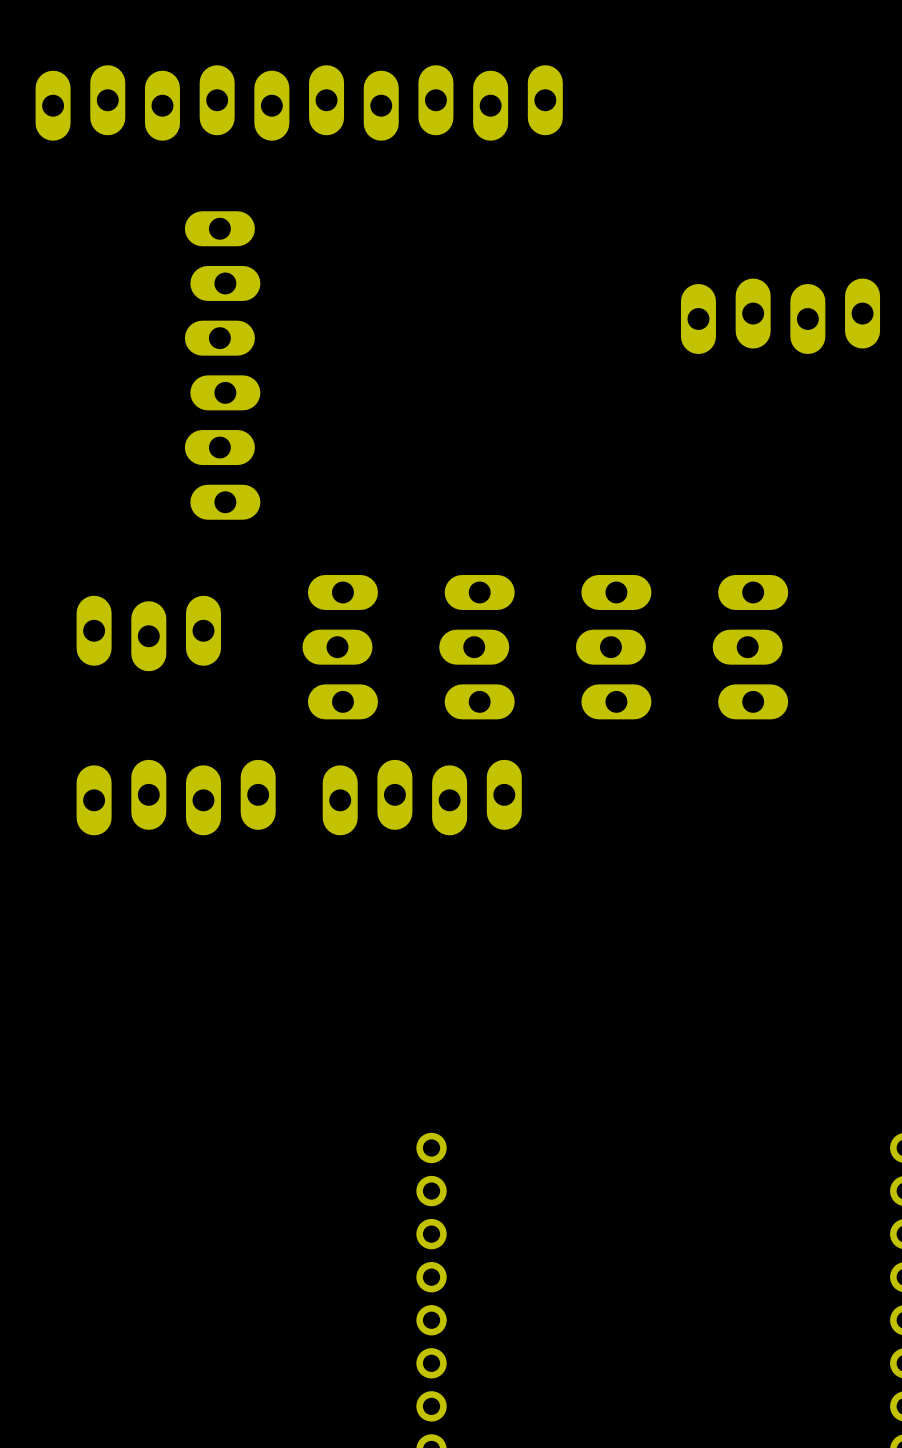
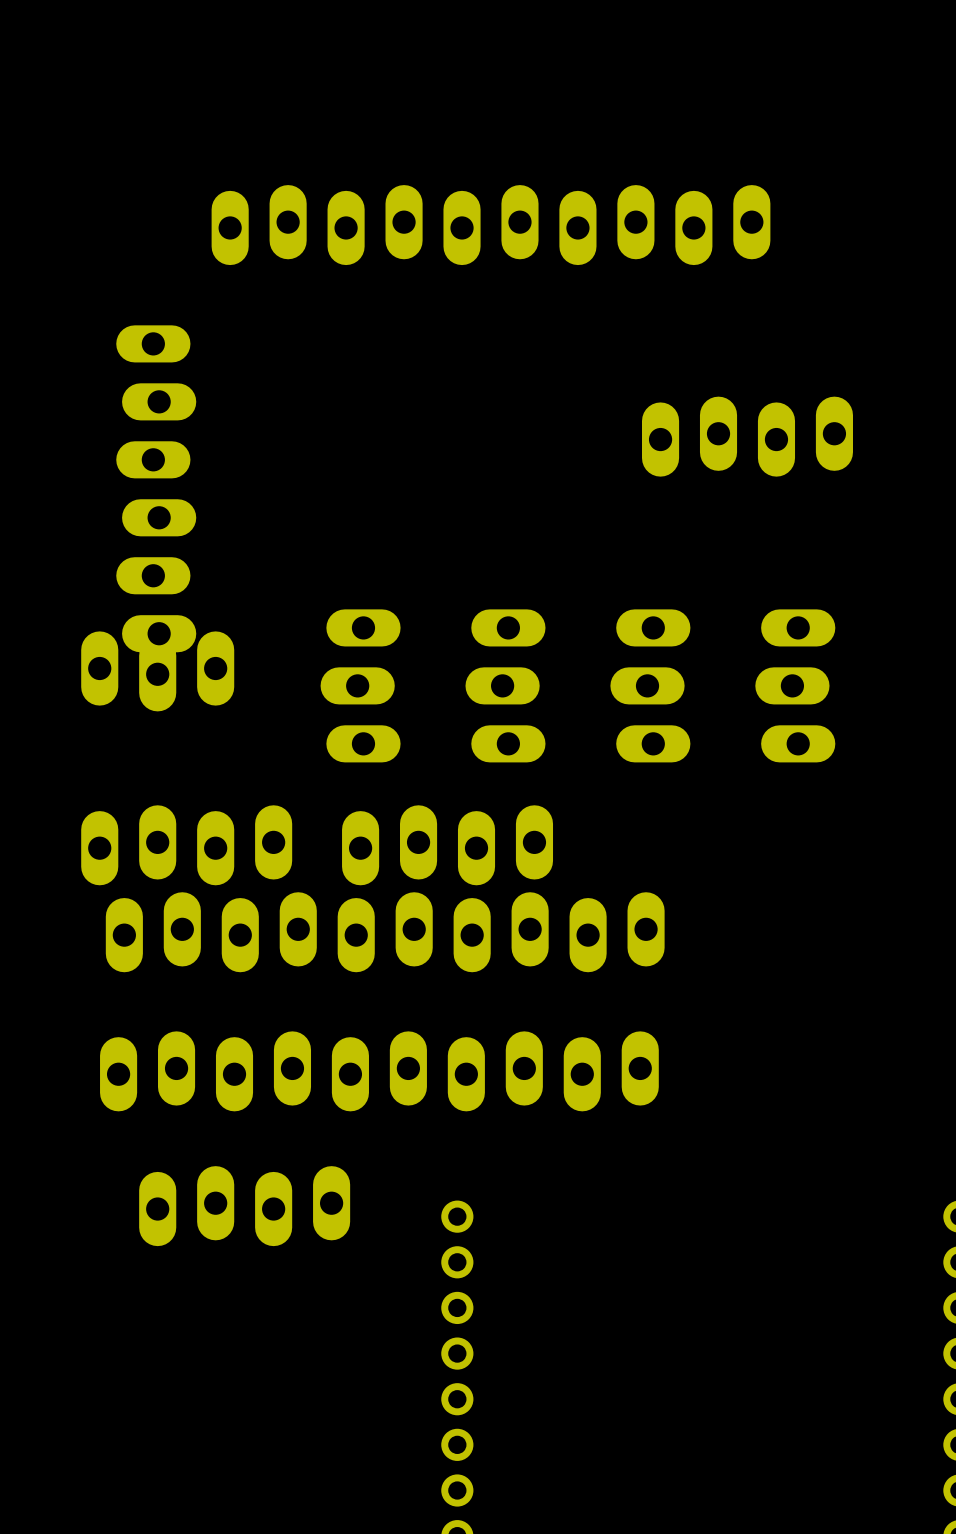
part position: (299, 102) -> (491, 225)
part position: (780, 316) -> (747, 436)
part position: (222, 365) -> (156, 488)
part: none -> (385, 932)
part: none -> (379, 1071)
part: none -> (244, 1206)

